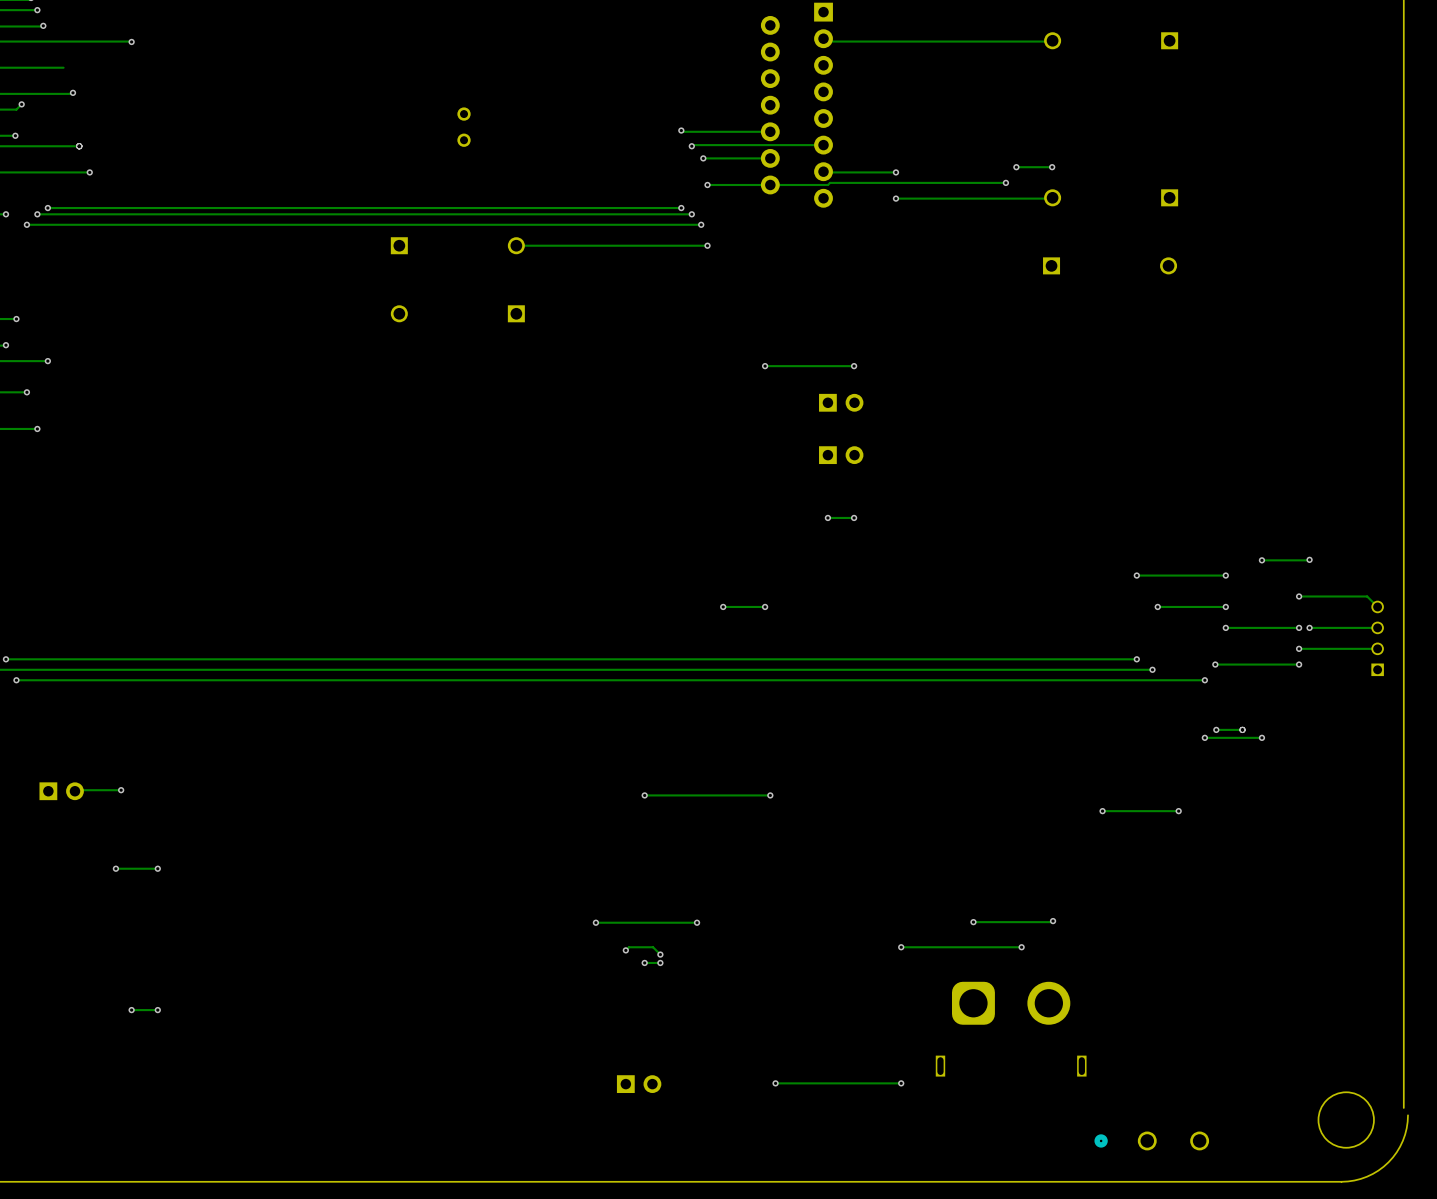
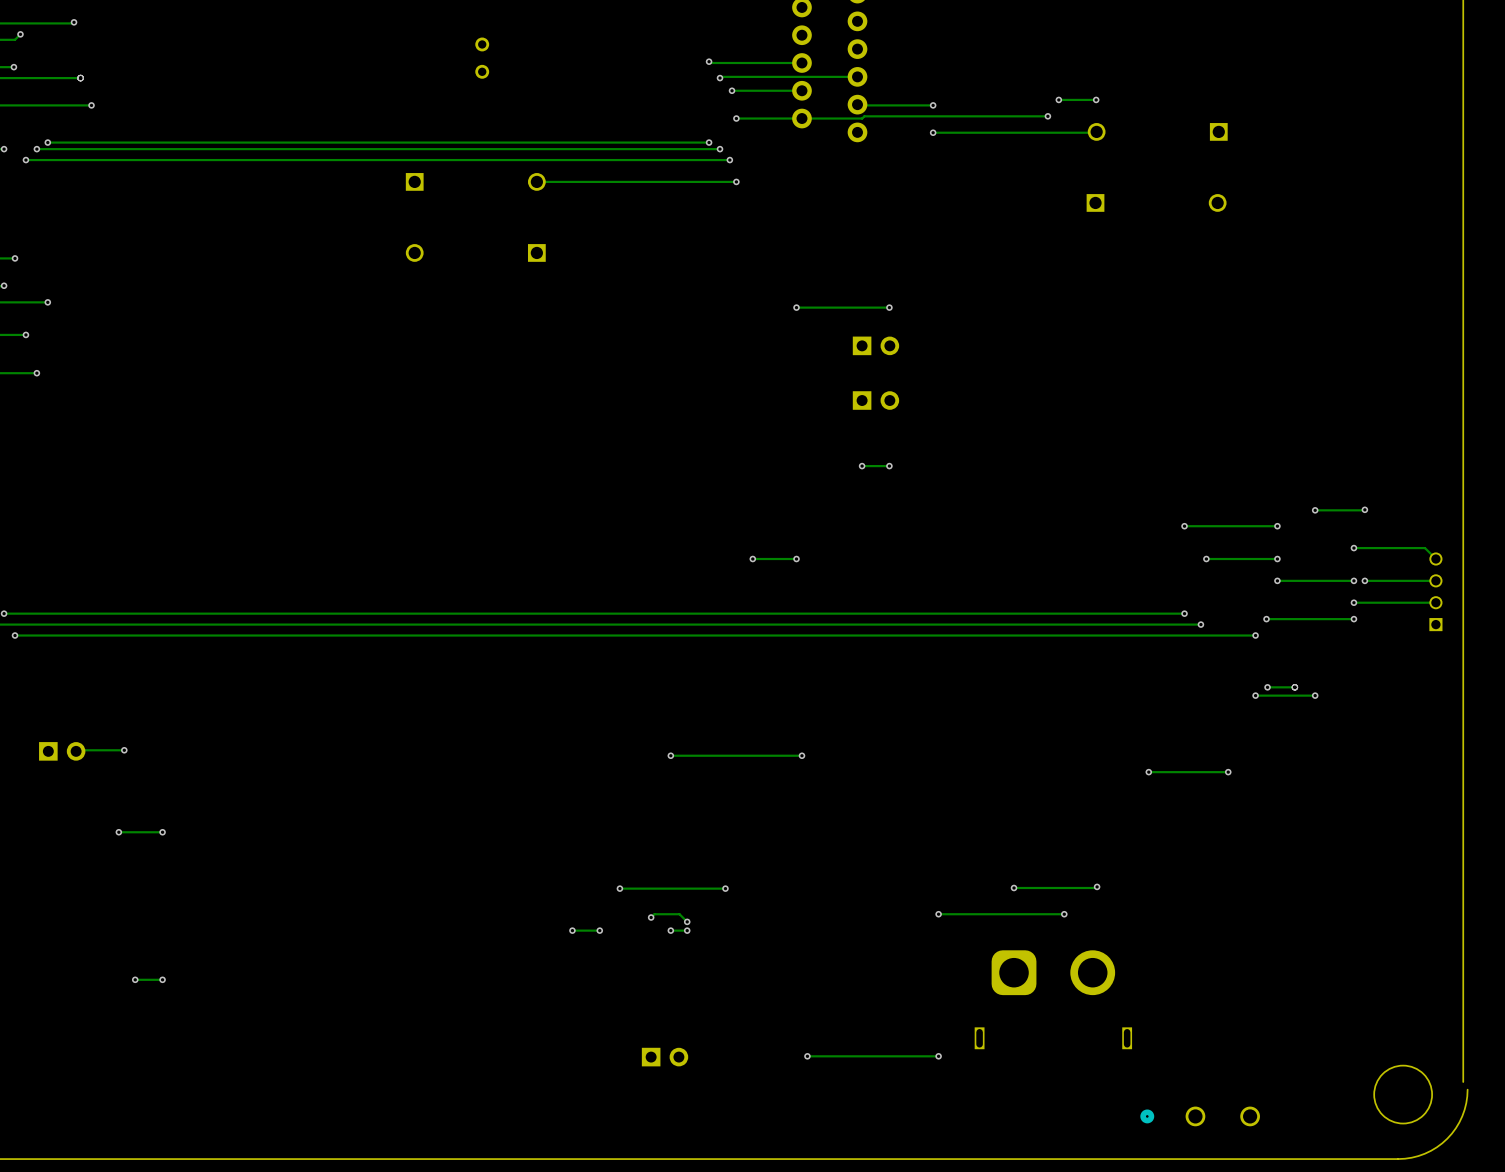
via: none -> (572, 930)
track: none -> (599, 930) (572, 930)
via: none -> (599, 930)

